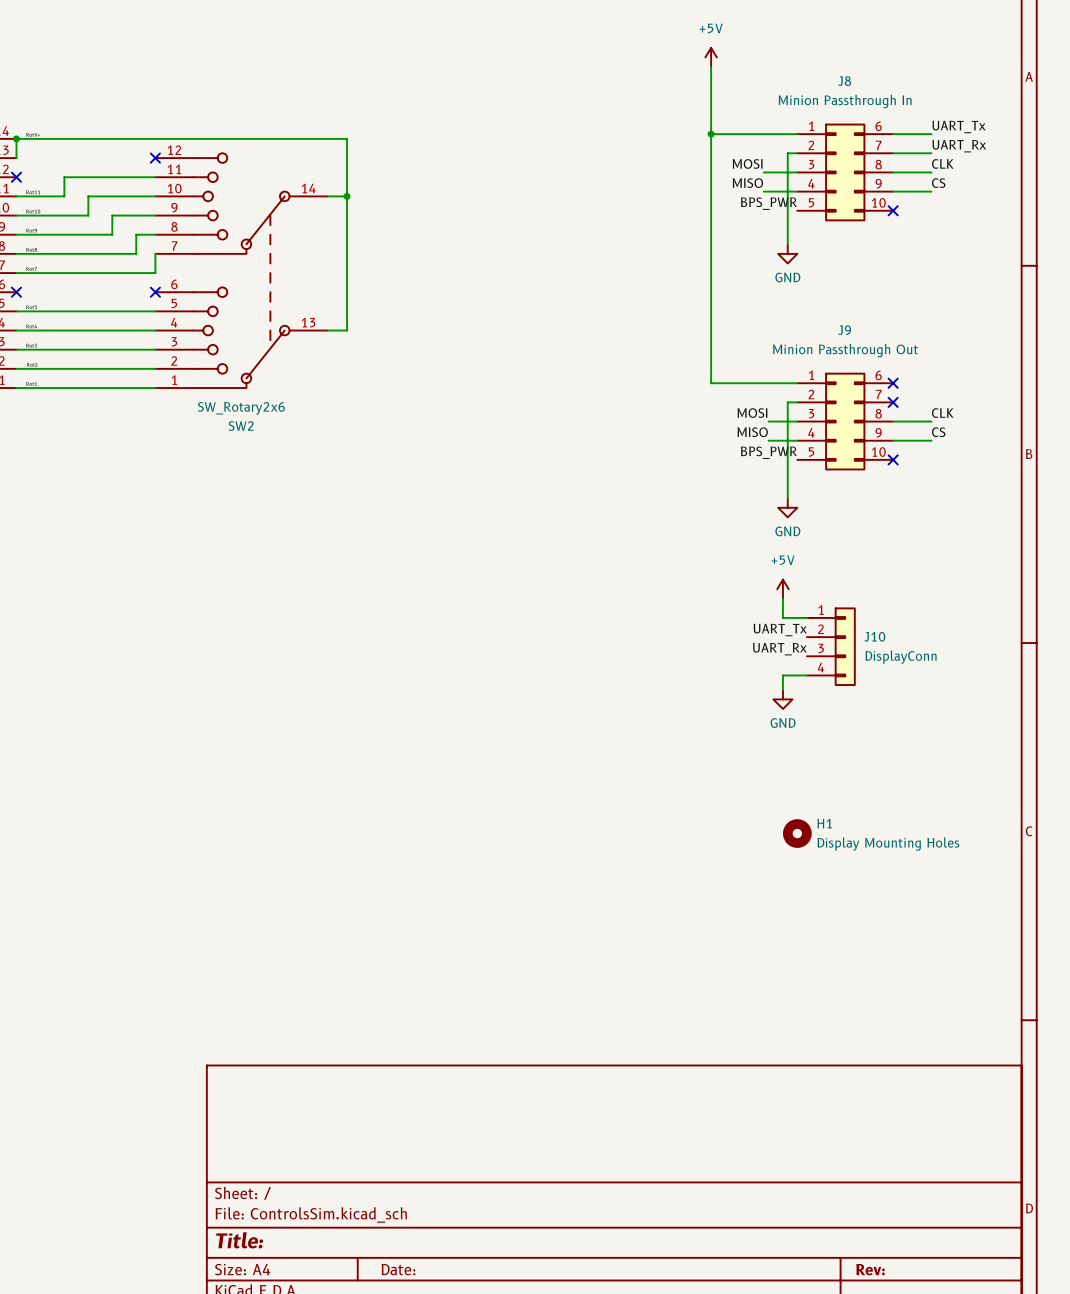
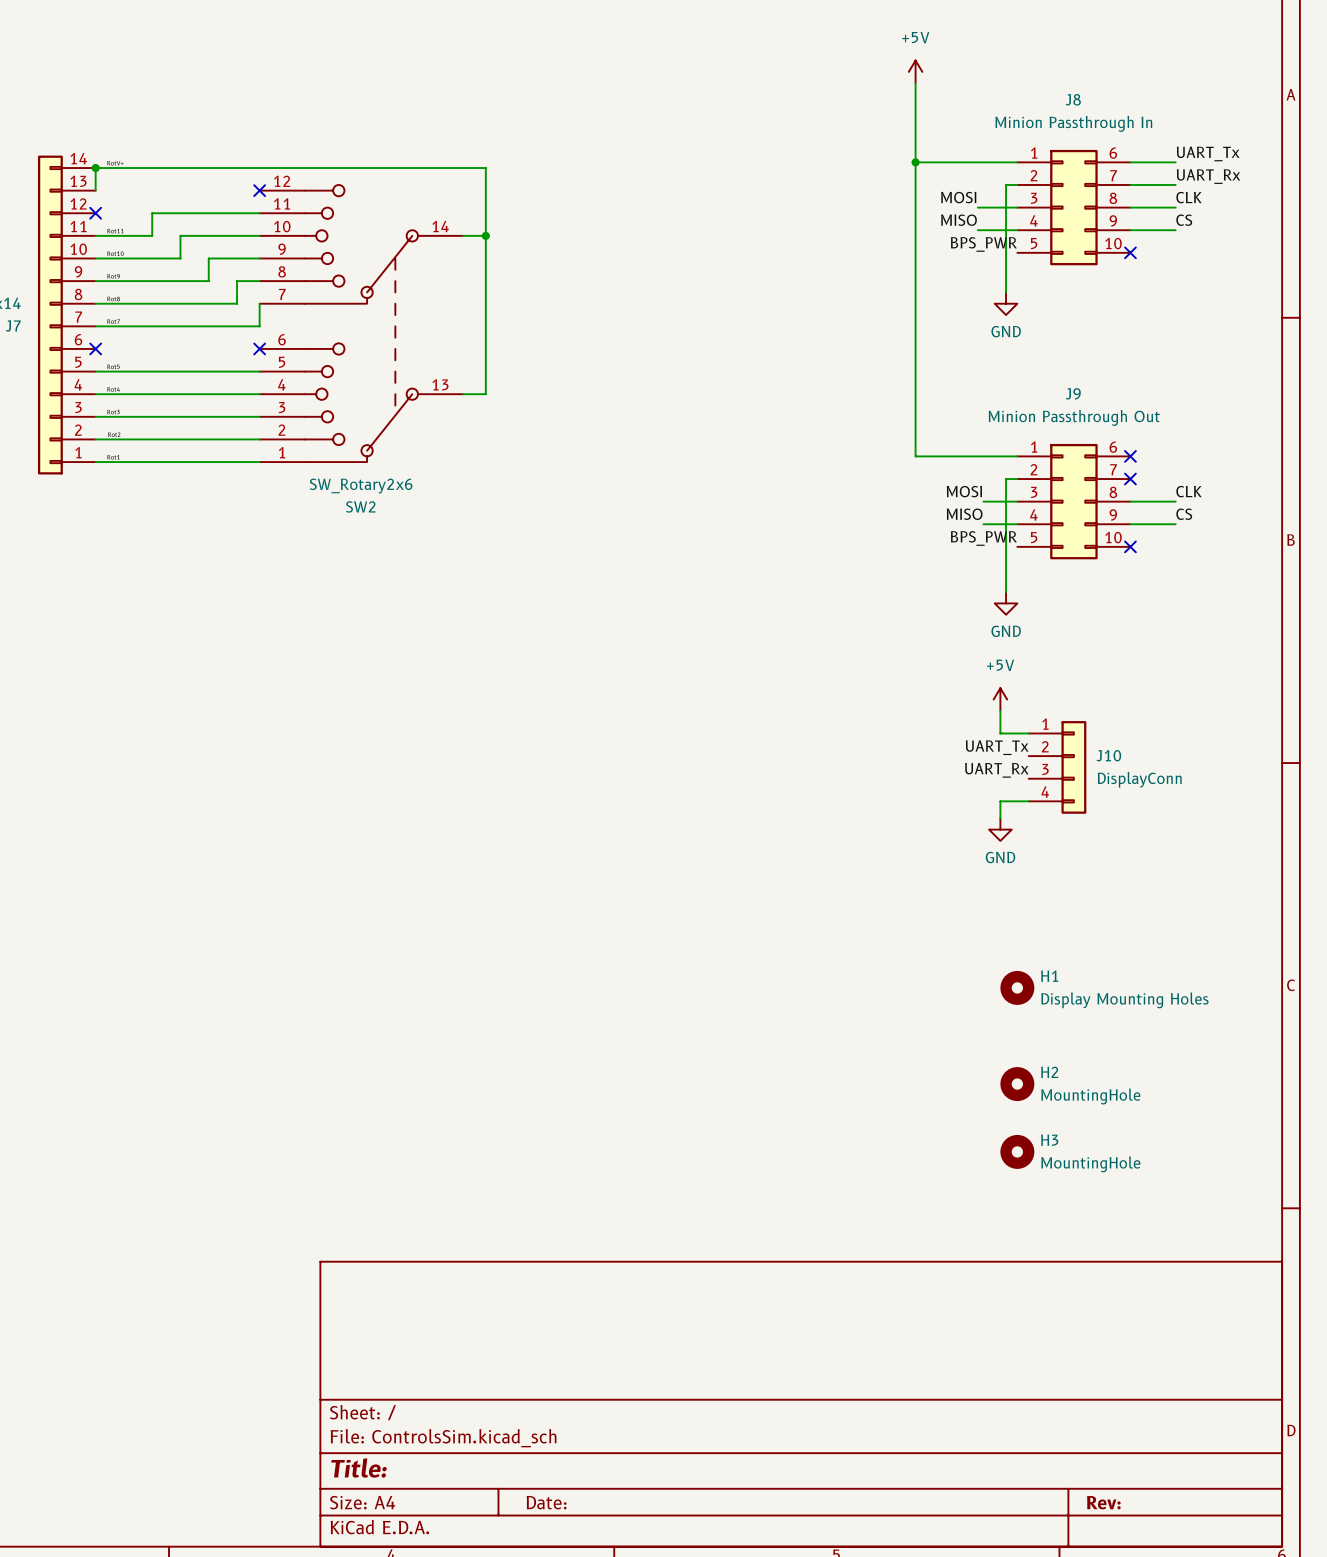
H2: none -> MountingHole (1017, 1084)
H3: none -> MountingHole (1017, 1151)

